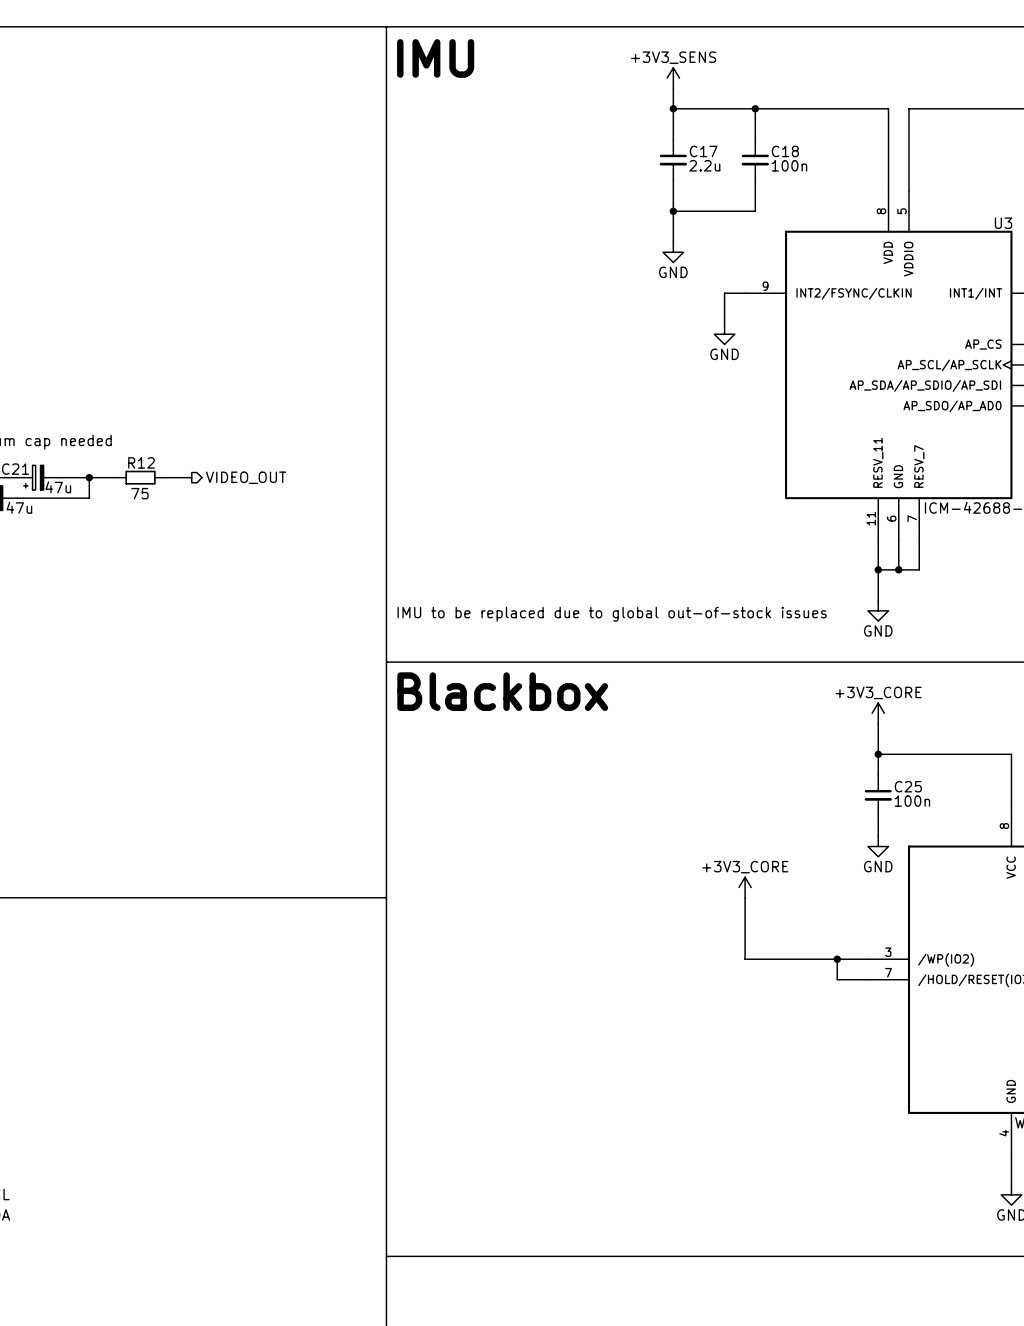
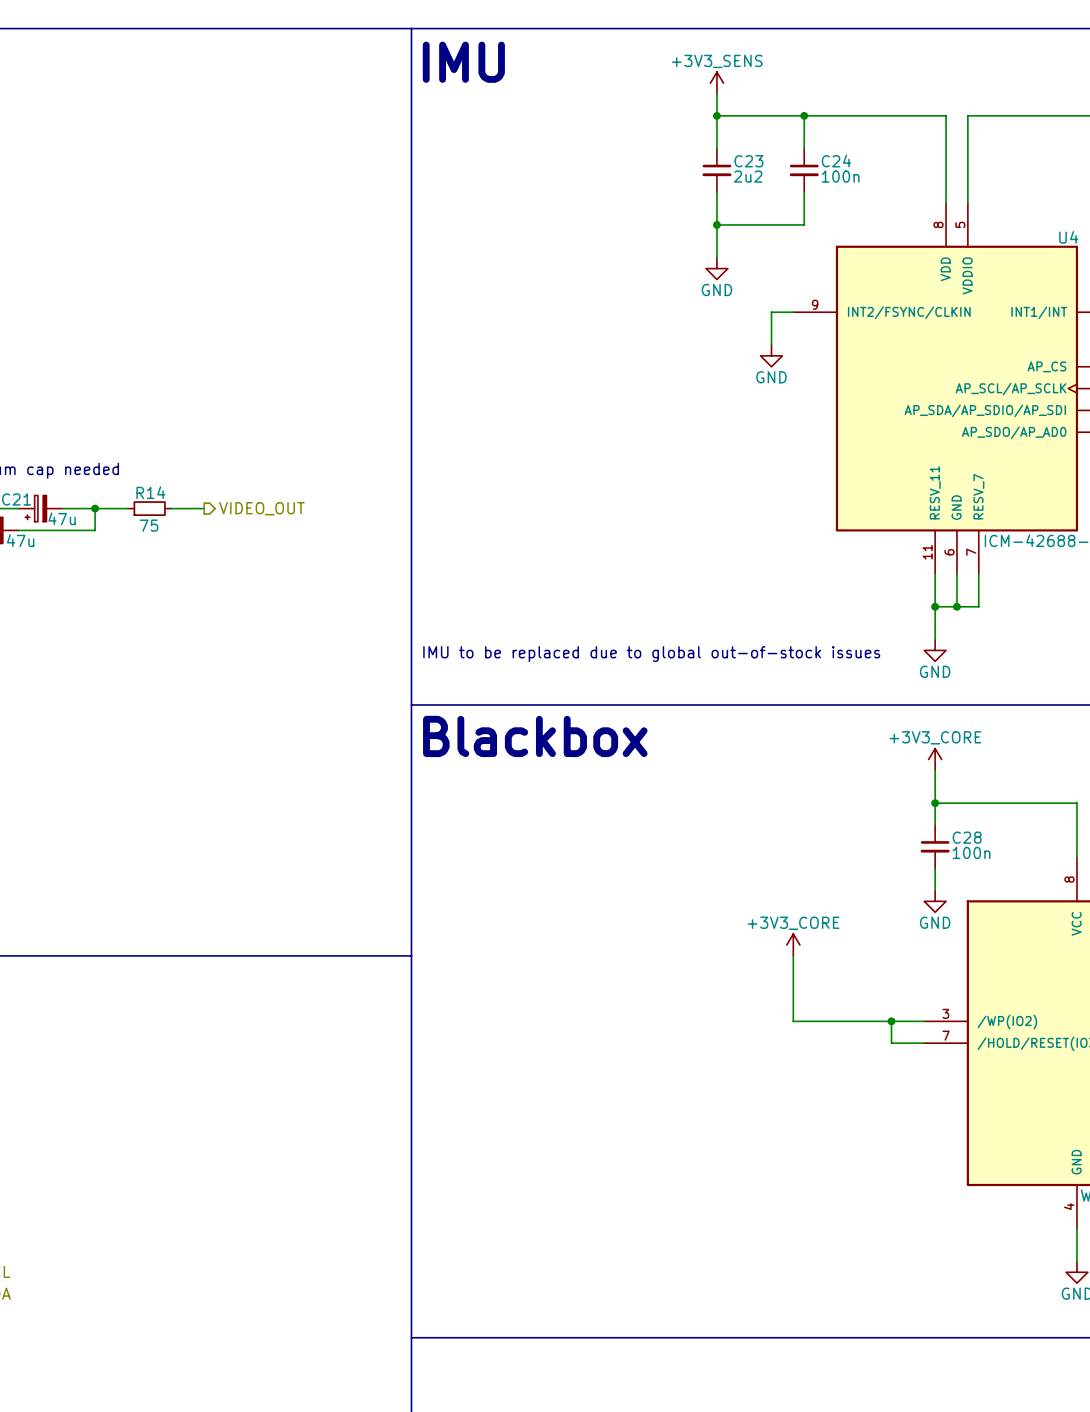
C17 name: C17 (703, 151) -> C23 (748, 161)
C18 name: C18 (785, 151) -> C24 (836, 161)
C17 value: 2.2u (704, 165) -> 2u2 (748, 176)
U3 name: U3 (1003, 223) -> U4 (1068, 237)
R12 name: R12 (141, 462) -> R14 (150, 492)
C25 name: C25 (908, 786) -> C28 (967, 837)

